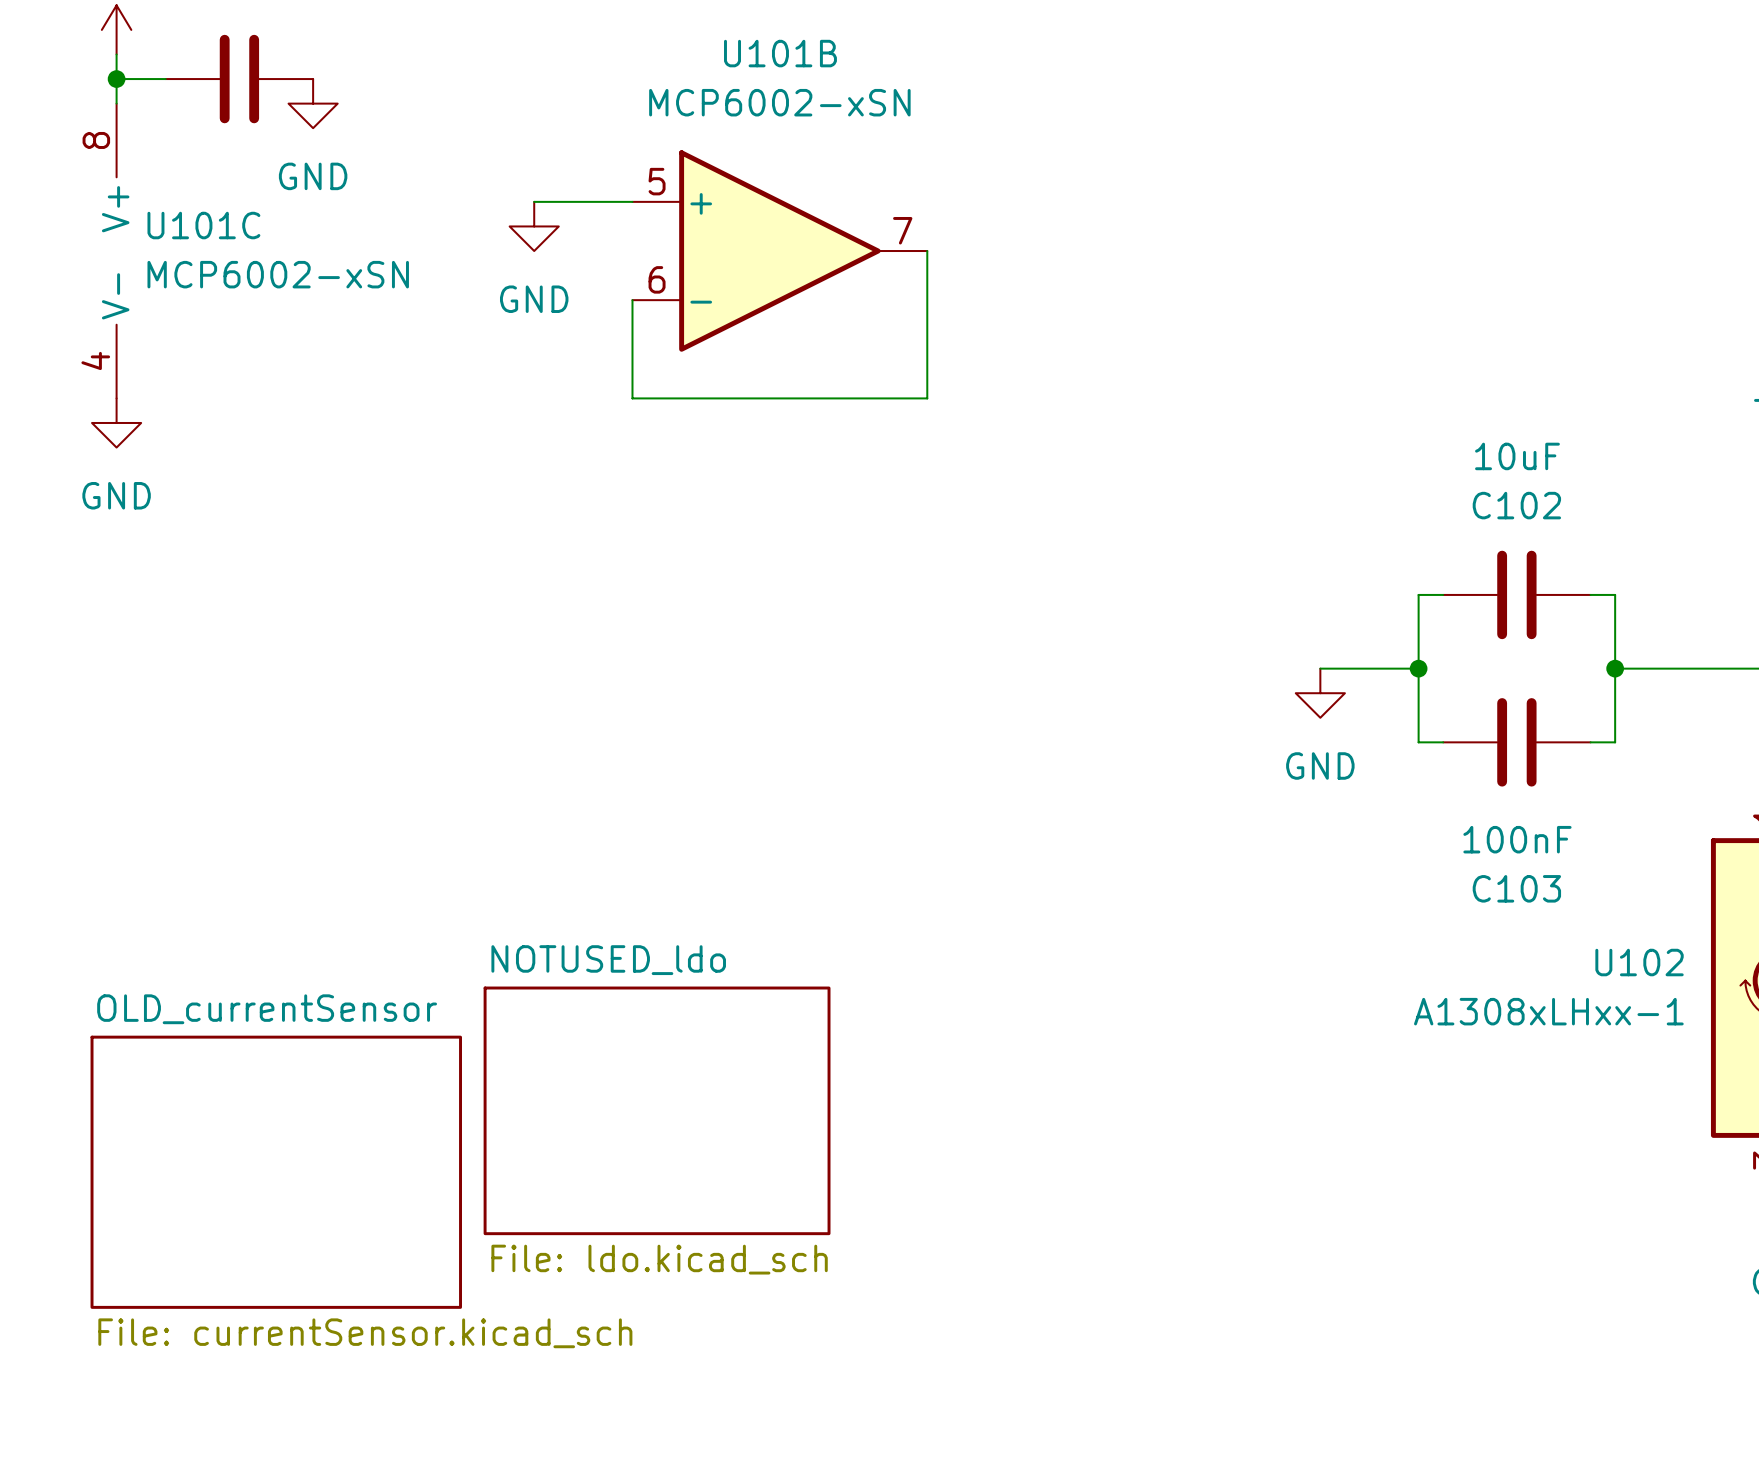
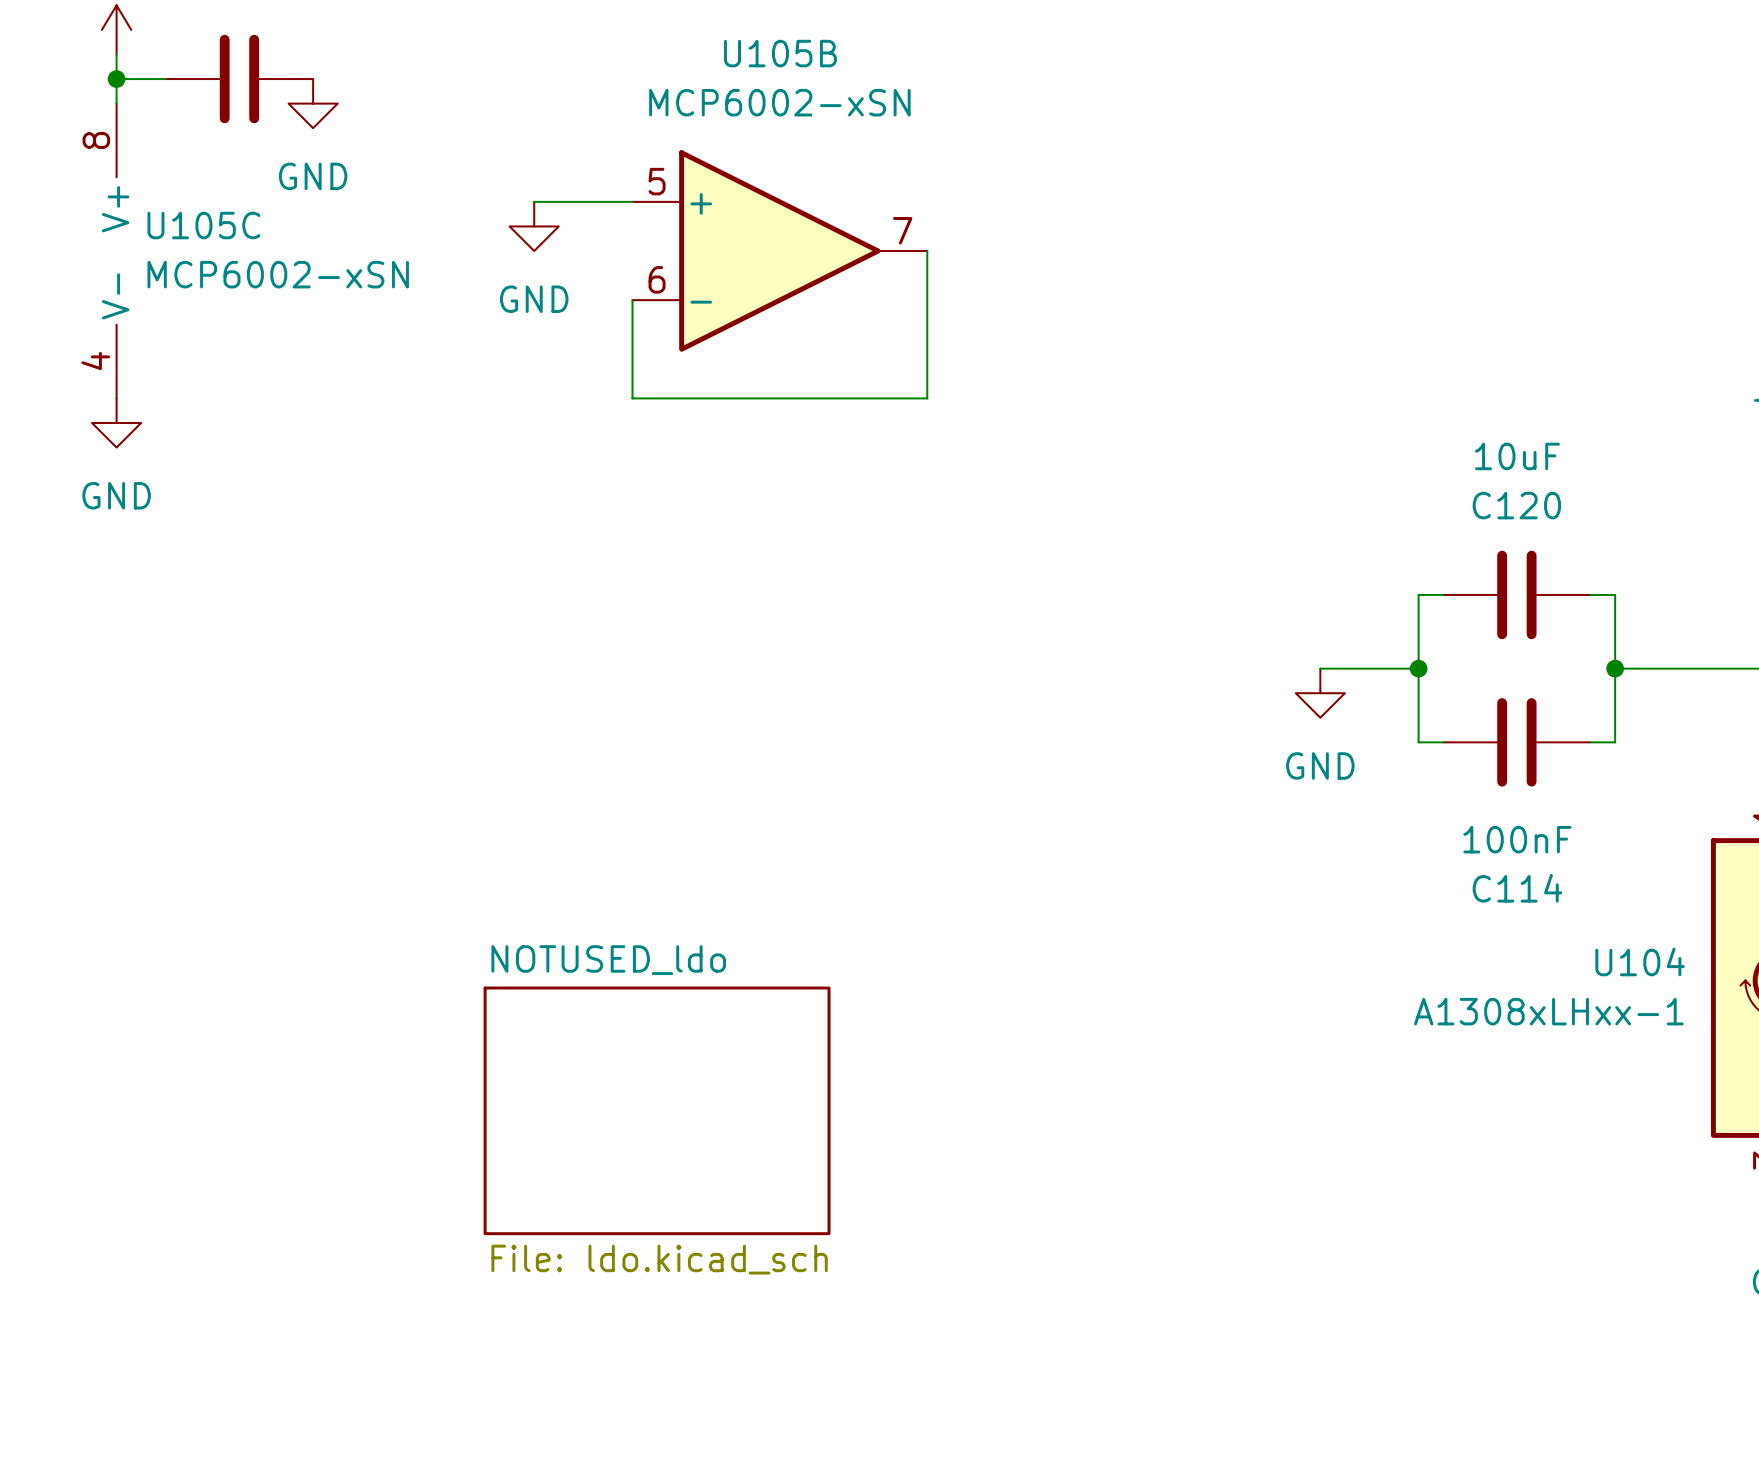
U101B name: U101B (780, 53) -> U105B (780, 53)
U101C name: U101C (203, 225) -> U105C (203, 225)
C102 name: C102 (1516, 505) -> C120 (1516, 505)
C103 name: C103 (1516, 888) -> C114 (1517, 888)
U102 name: U102 (1639, 962) -> U104 (1640, 961)
sheet OLD_currentSensor: File: currentSensor.kicad_sch (276, 1172) -> none

